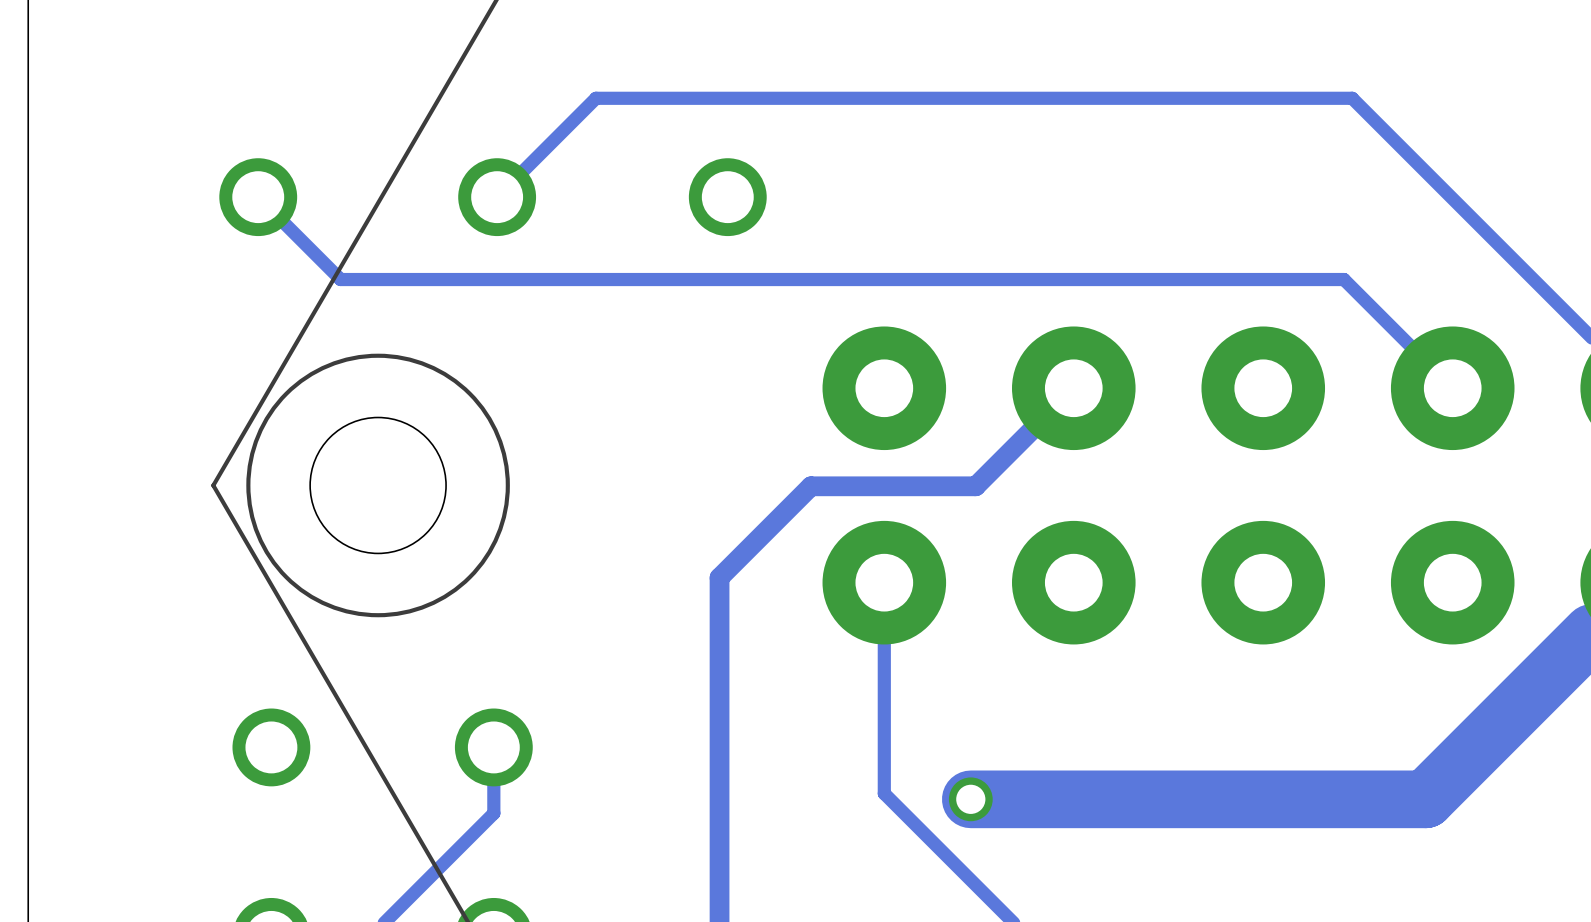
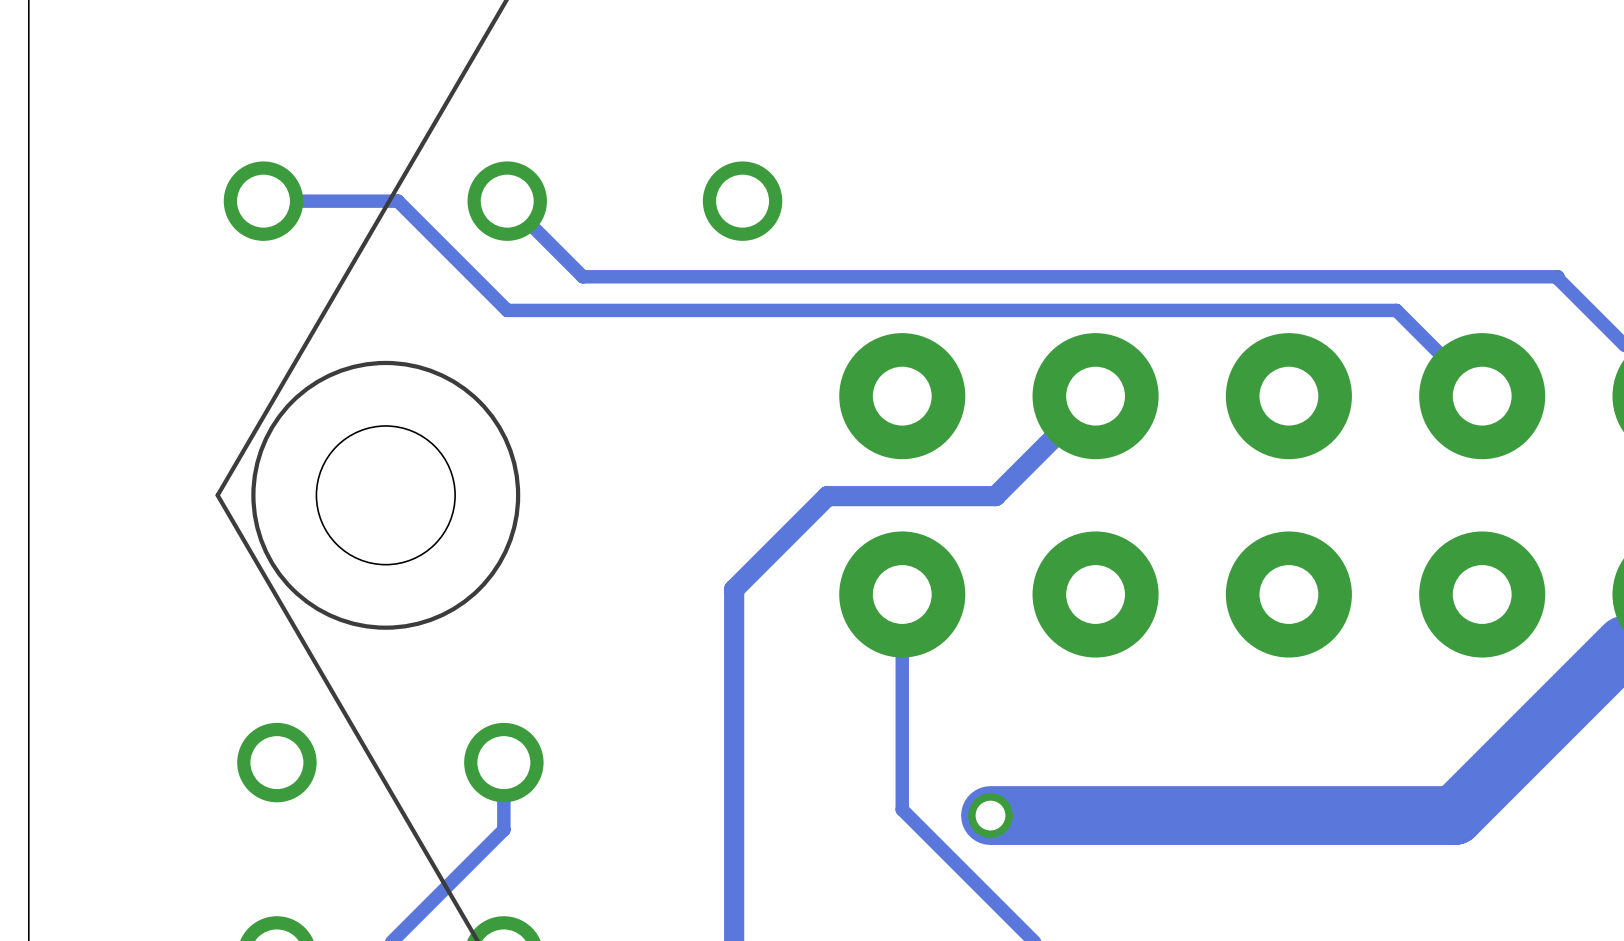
track: (258, 197) (340, 279) (1343, 279) (1368, 304) -> (263, 201) (397, 201) (507, 310) (1396, 310)
track: (497, 197) (595, 98) (1352, 98) (1526, 272) -> (507, 201) (582, 276) (1557, 276) (1557, 278)

